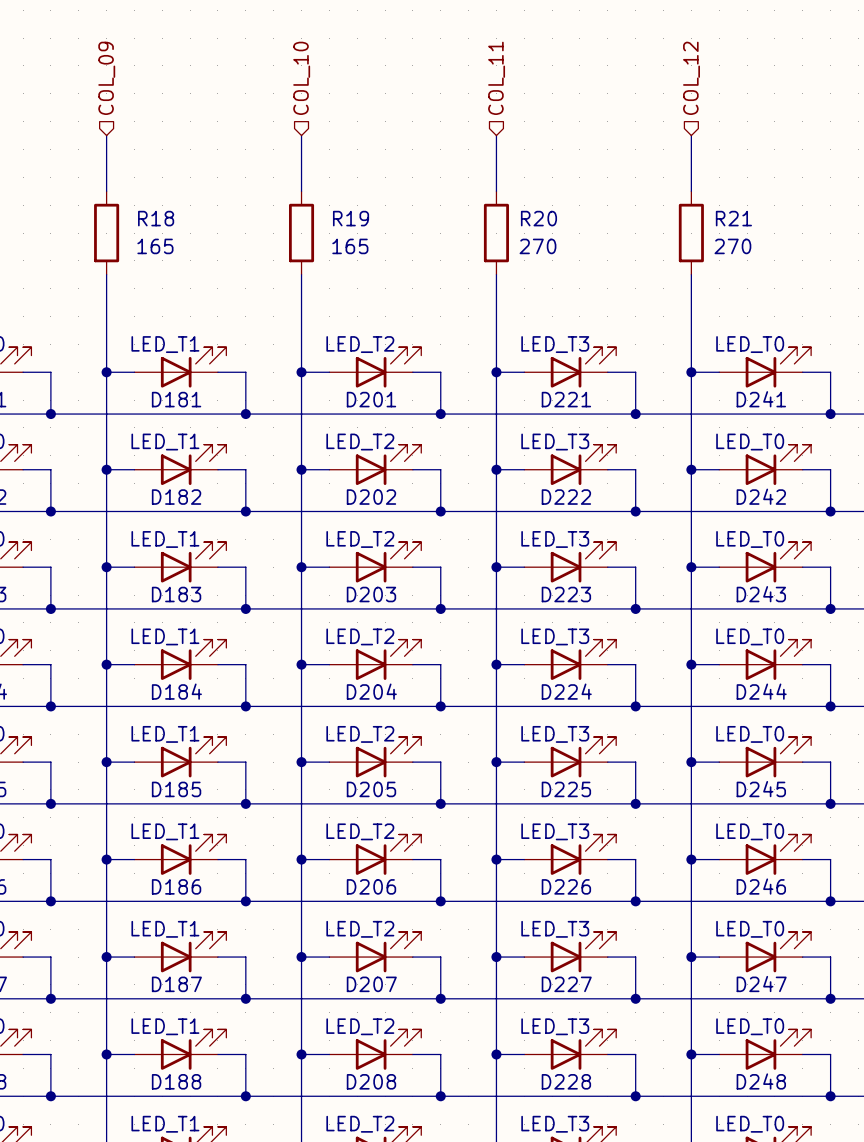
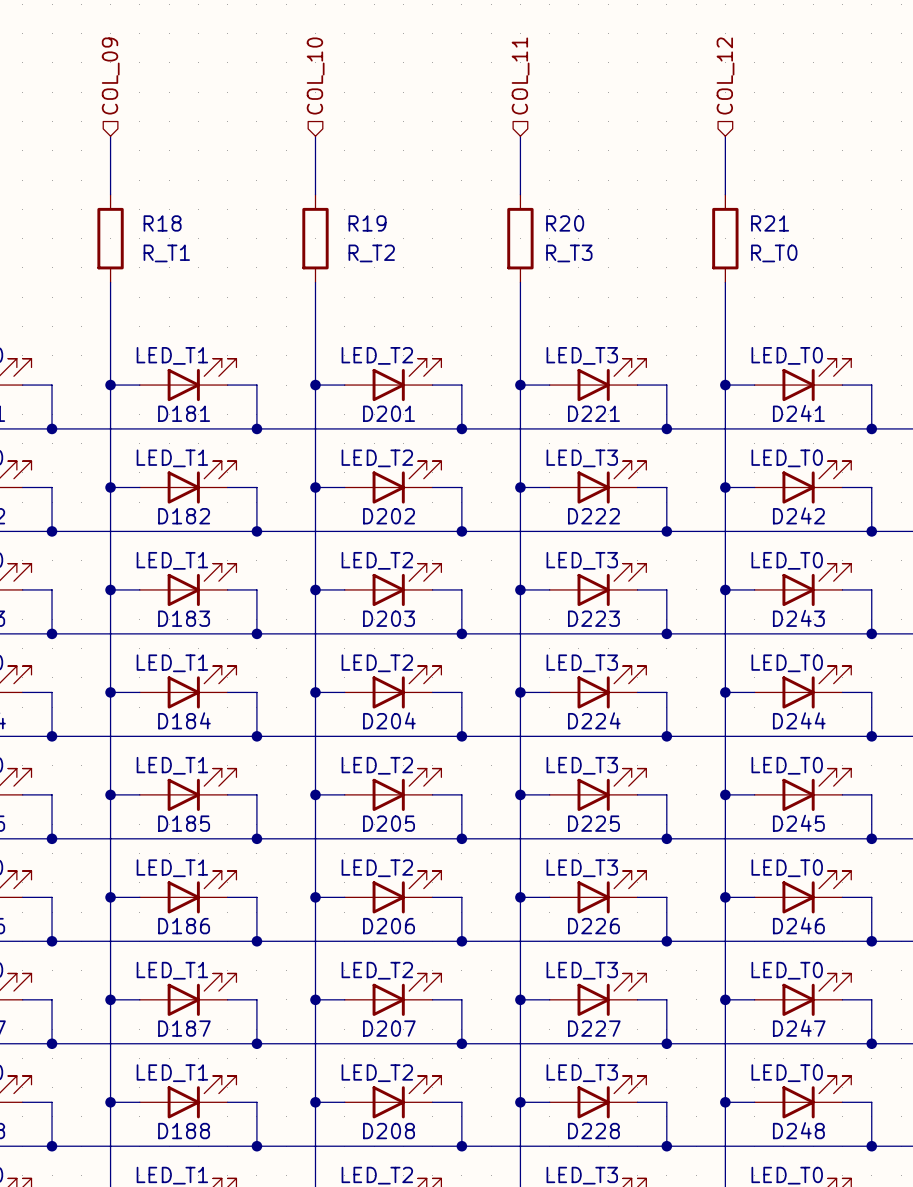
R18 value: 165 (155, 246) -> R_T1 (166, 253)
R19 value: 165 (350, 246) -> R_T2 (371, 253)
R20 value: 270 (537, 246) -> R_T3 (569, 253)
R21 value: 270 (732, 246) -> R_T0 (774, 253)

